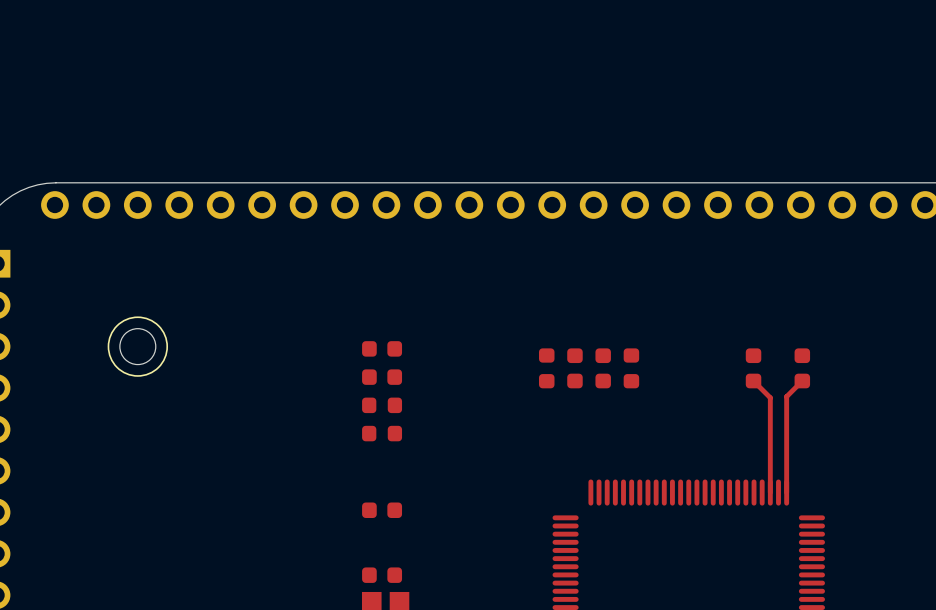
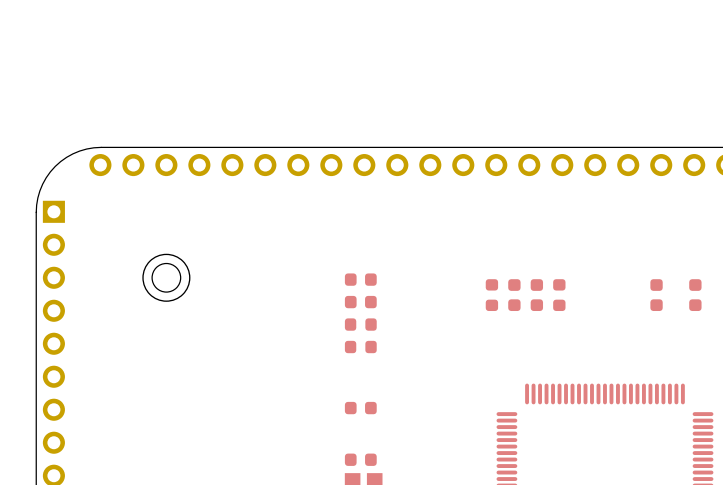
top track: (753, 380) (770, 397) (770, 492) -> none
top track: (802, 380) (786, 396) (786, 492) -> none

